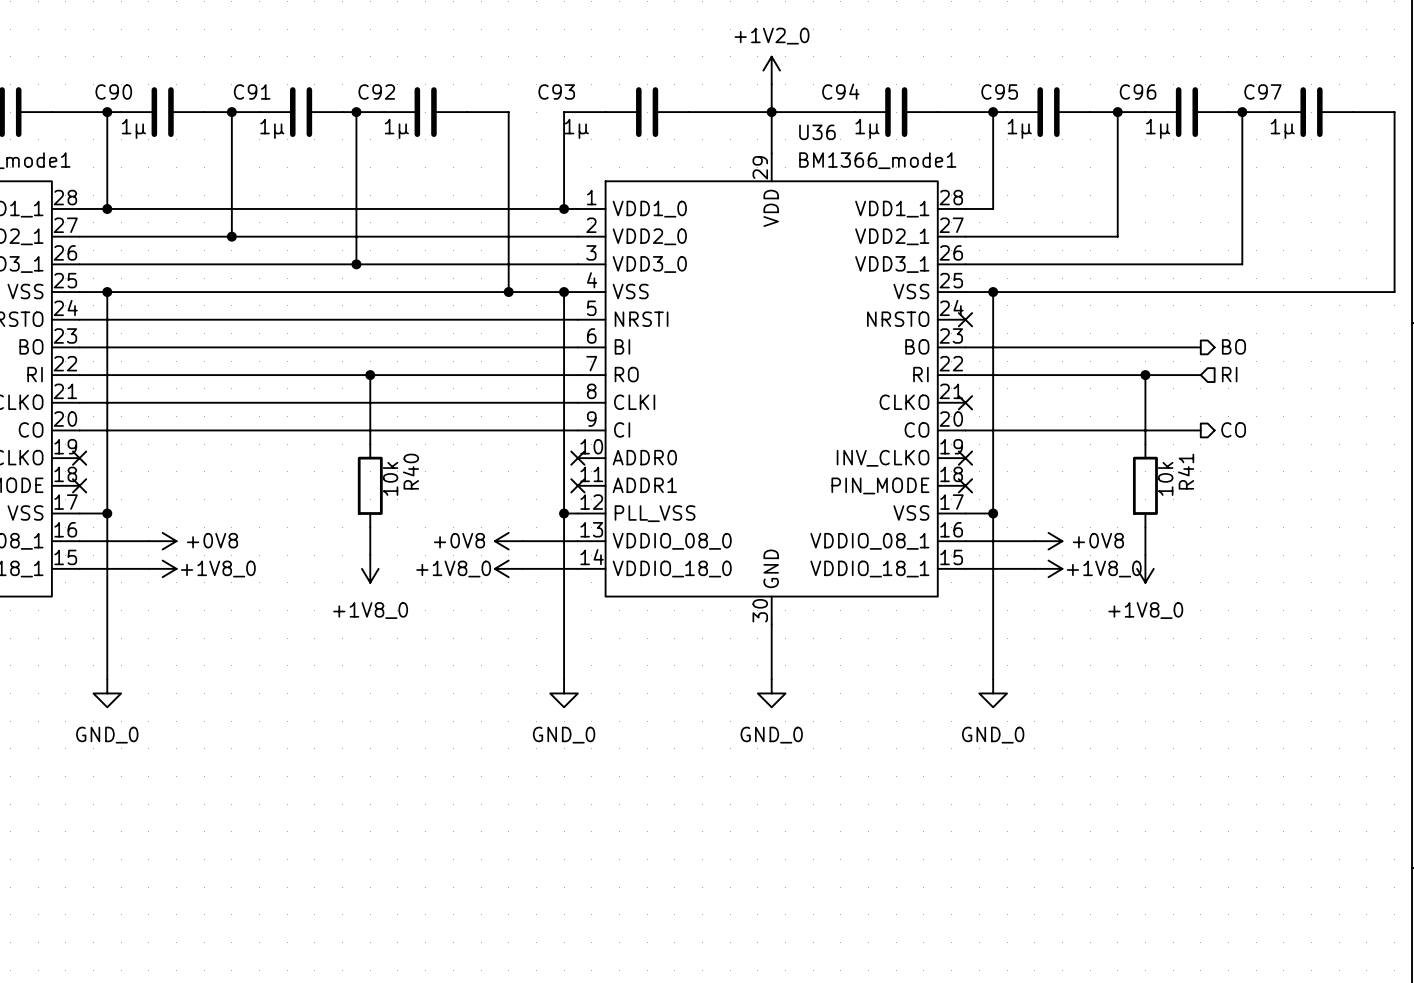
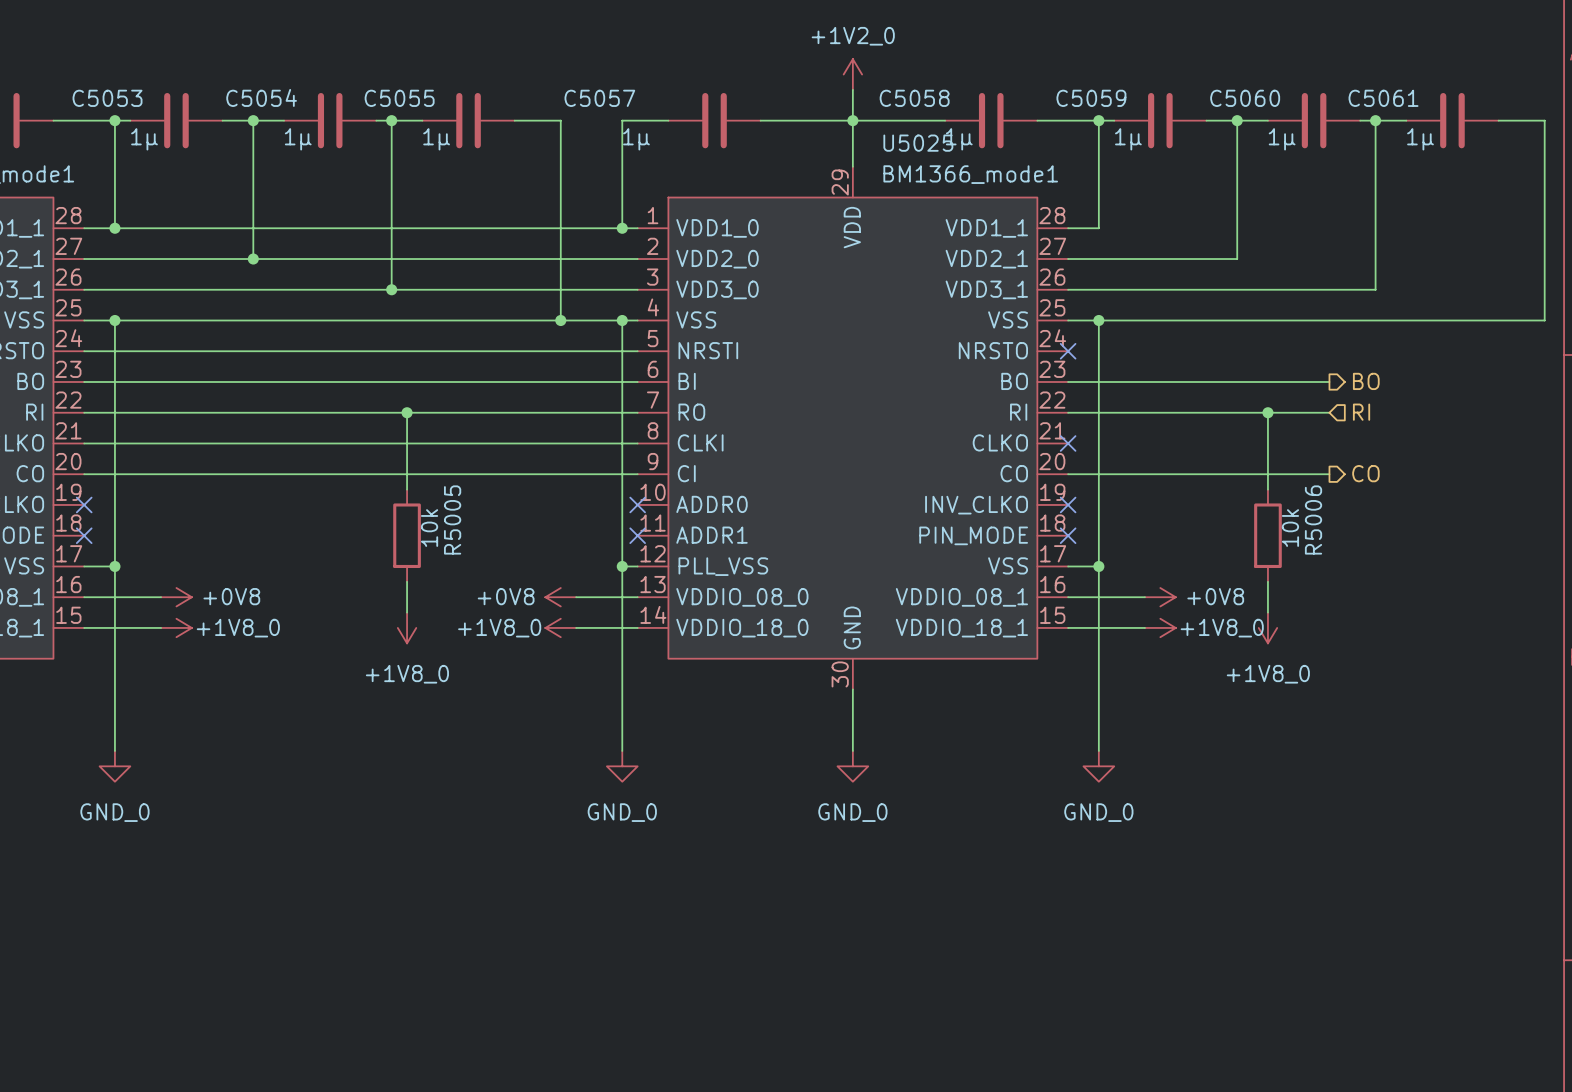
C90 name: C90 (113, 91) -> C5053 (107, 98)
C91 name: C91 (252, 91) -> C5054 (261, 97)
C92 name: C92 (376, 91) -> C5055 (399, 98)
C93 name: C93 (556, 91) -> C5057 (599, 98)
C94 name: C94 (840, 91) -> C5058 (914, 98)
C95 name: C95 (999, 91) -> C5059 (1091, 98)
C96 name: C96 (1138, 91) -> C5060 (1245, 98)
C97 name: C97 (1262, 91) -> C5061 (1383, 98)
U36 name: U36 (817, 132) -> U5025 (918, 143)
R40 name: R40 (410, 471) -> R5005 (452, 519)
R41 name: R41 (1186, 471) -> R5006 (1313, 519)

